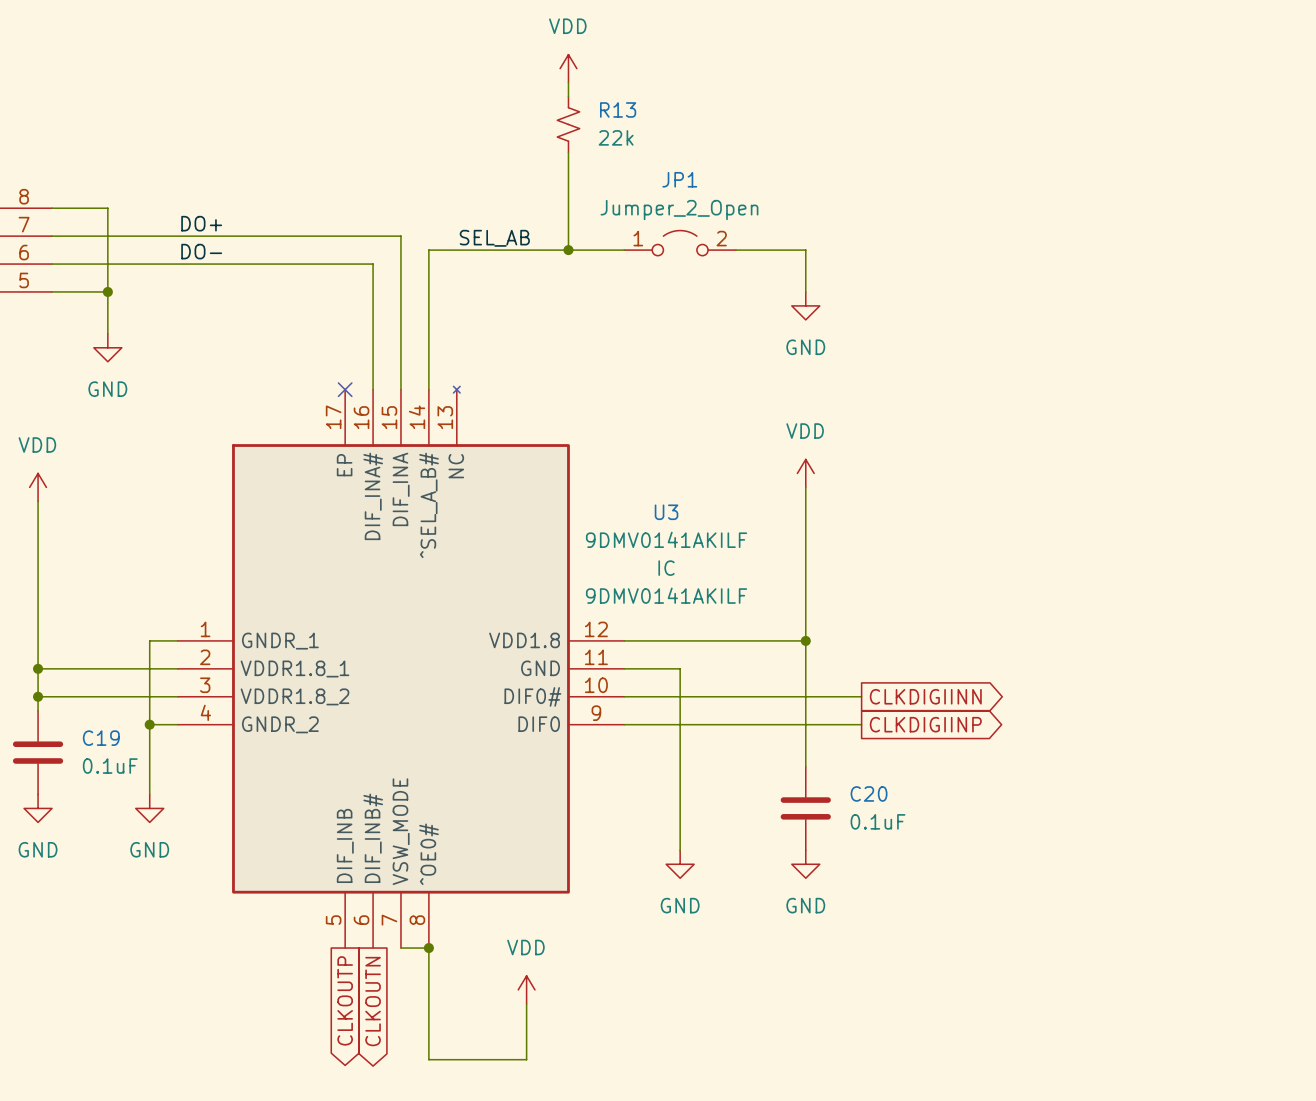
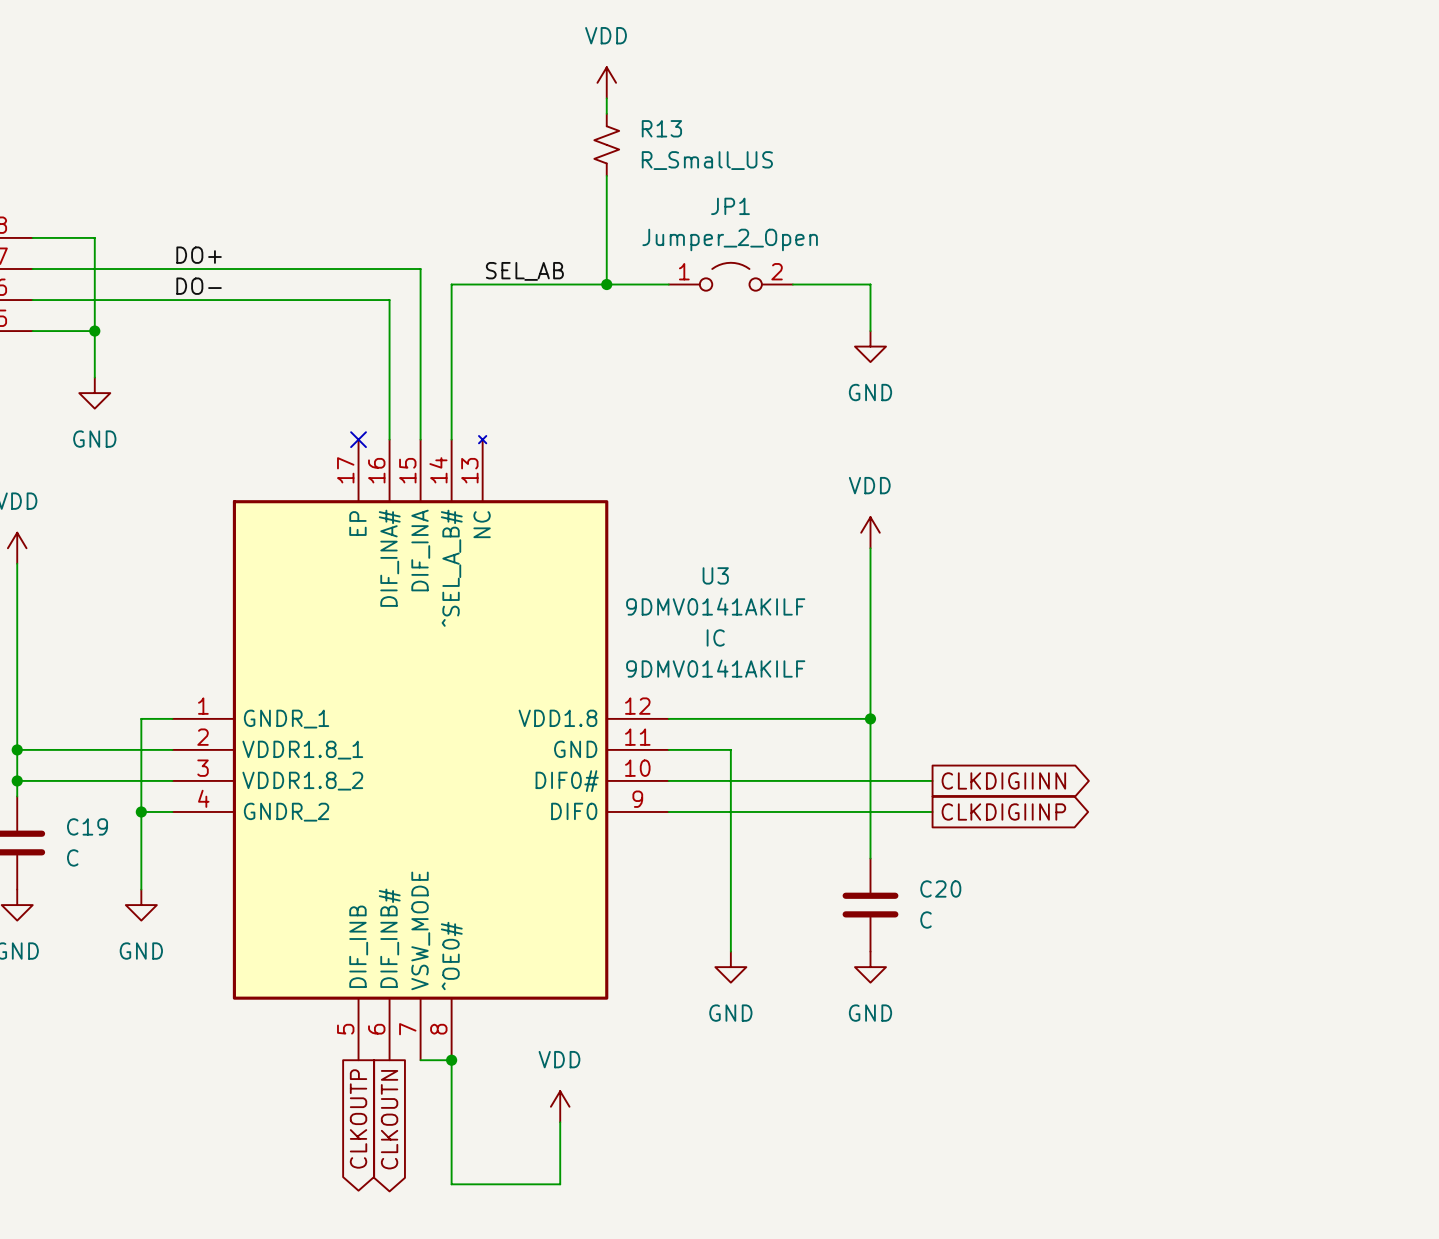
R13 value: 22k (616, 137) -> R_Small_US (707, 160)
C19 value: 0.1uF (110, 766) -> C (72, 857)
C20 value: 0.1uF (878, 821) -> C (926, 920)

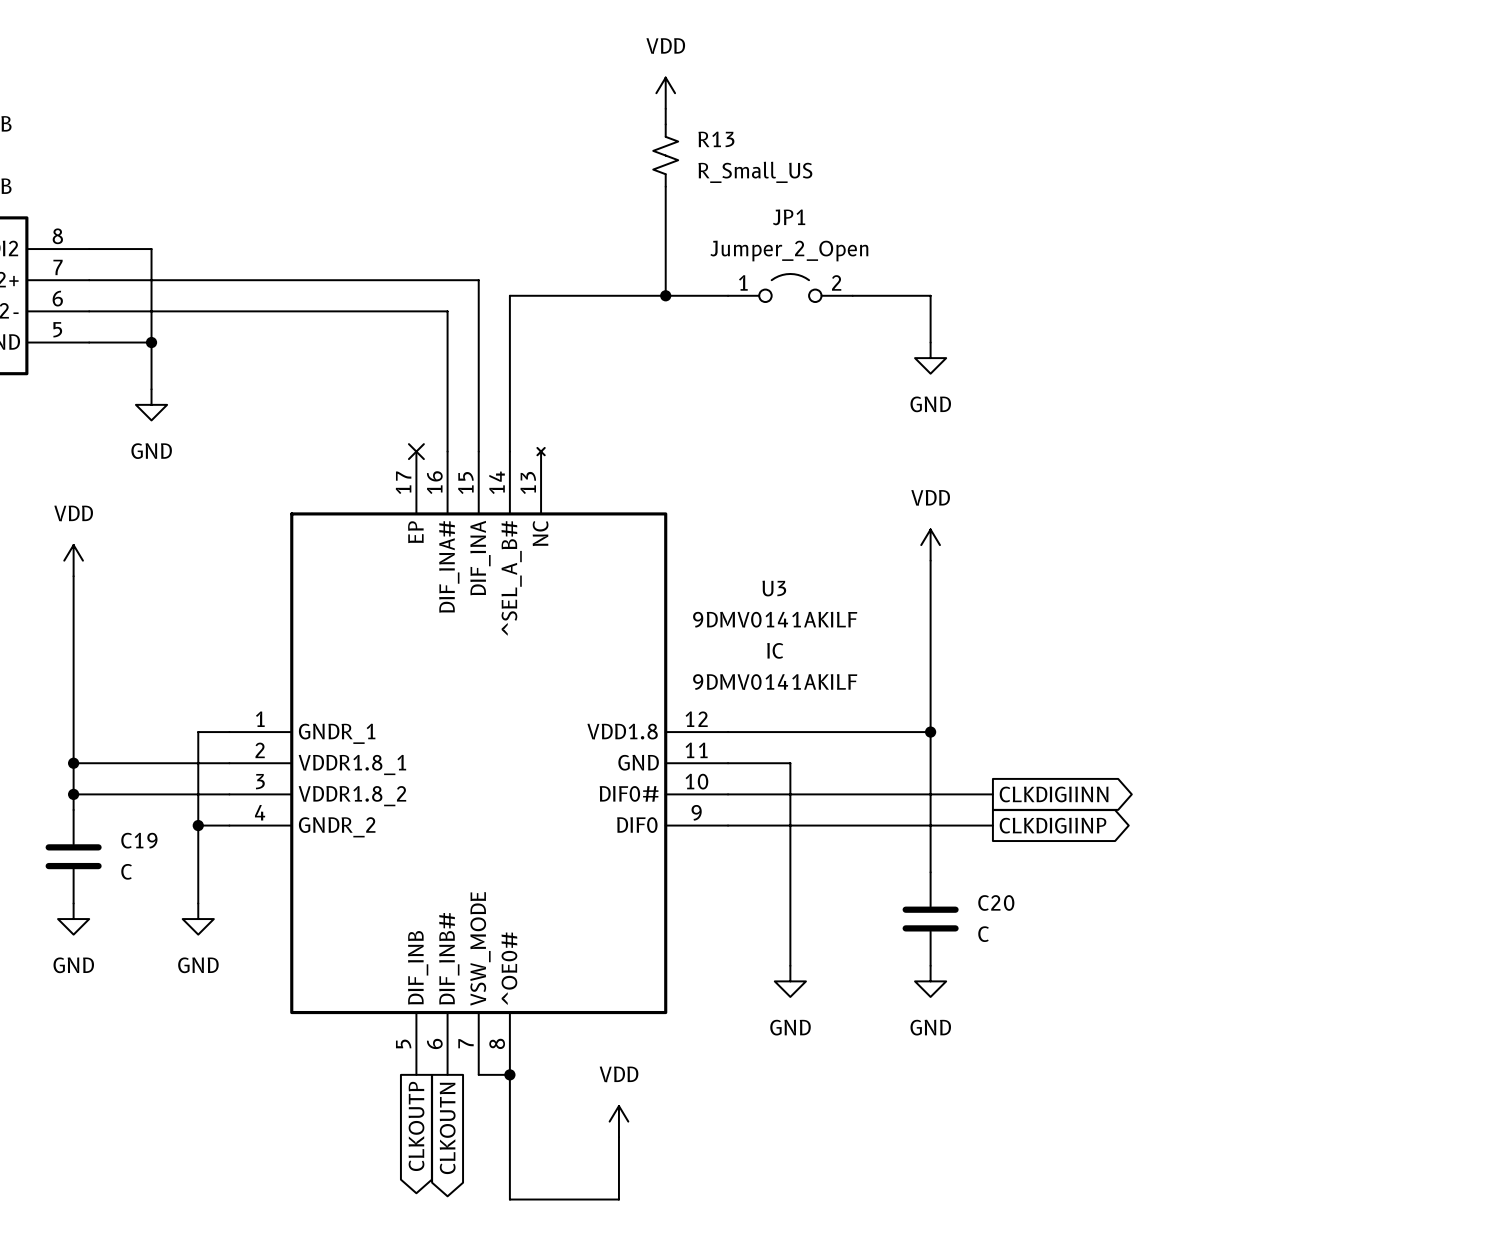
label: DO+ (199, 255) -> none
label: SEL_AB (524, 271) -> none
label: DO- (199, 286) -> none

